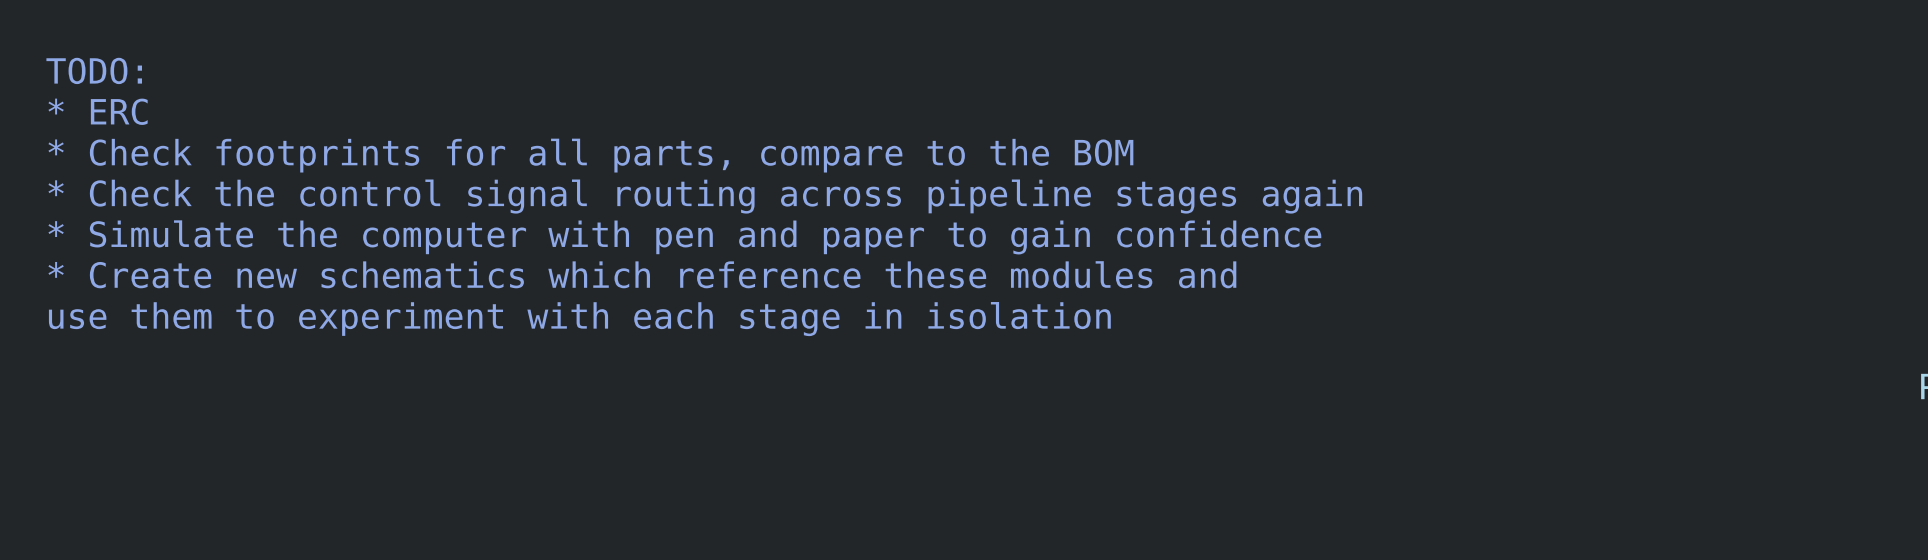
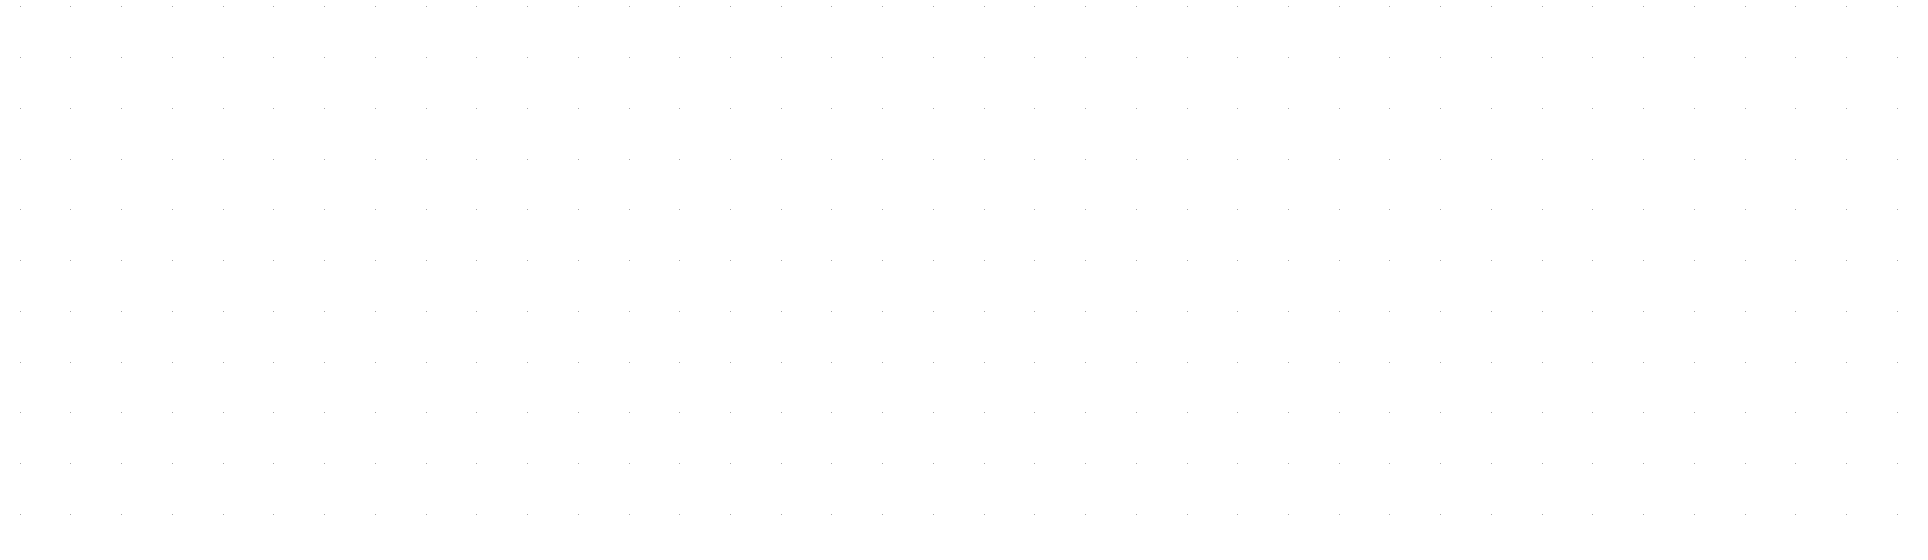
text: TODO: (94, 70) -> none
text: * ERC (98, 111) -> none
text: * Check footprints for all parts, compare to the BOM (590, 155) -> none
text: * Check the control signal routing across pipeline stages again (705, 196) -> none
text: * Simulate the computer with pen and paper to gain confidence (684, 237) -> none
text: * Create new schematics which reference these modules and (642, 274) -> none
text: use them to experiment with each stage in isolation (579, 319) -> none

